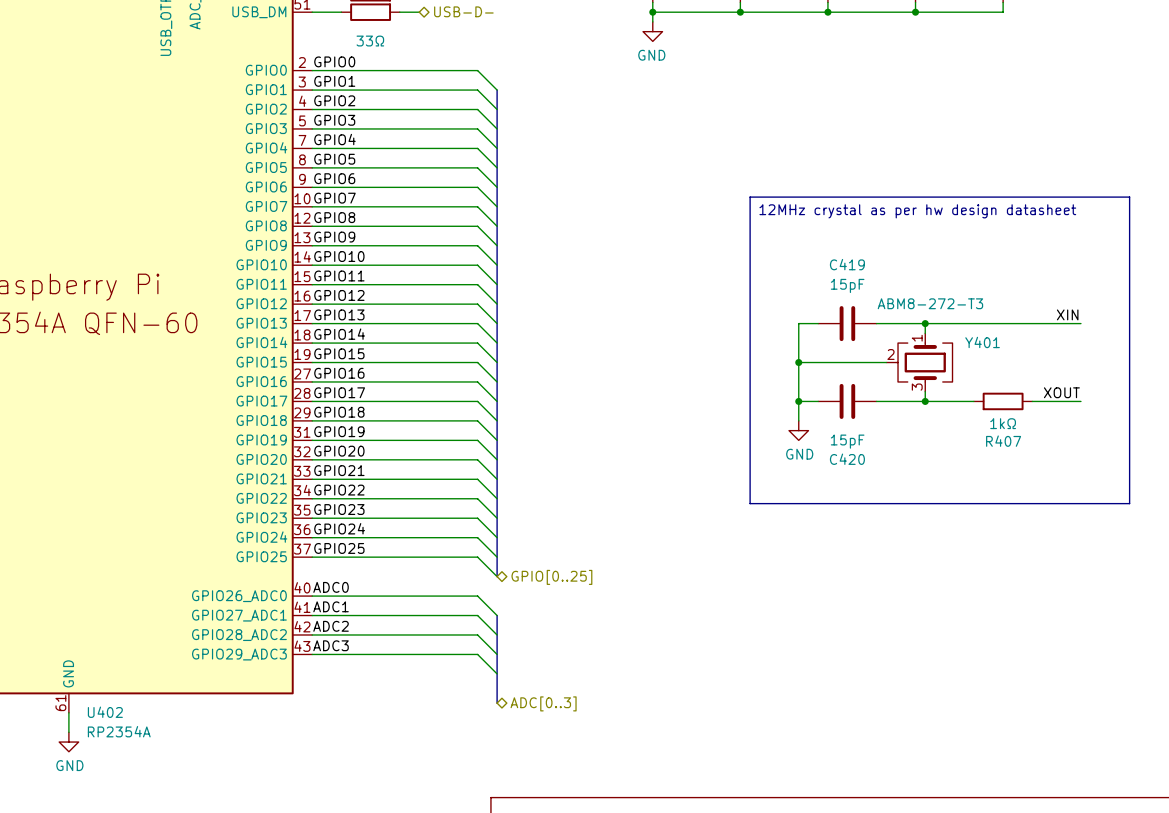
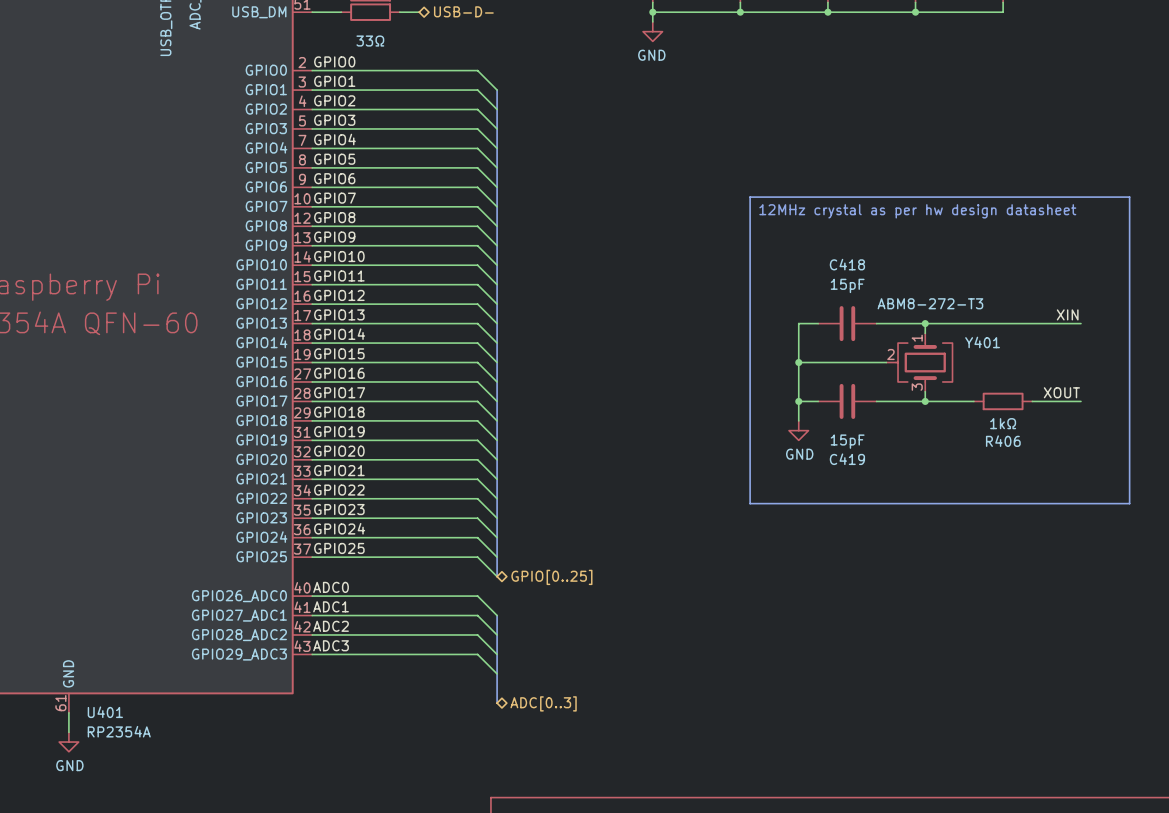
C419 name: C419 (847, 264) -> C418 (847, 264)
R407 name: R407 (1003, 441) -> R406 (1003, 441)
C420 name: C420 (847, 459) -> C419 (847, 459)
U402 name: U402 (105, 712) -> U401 (105, 712)

